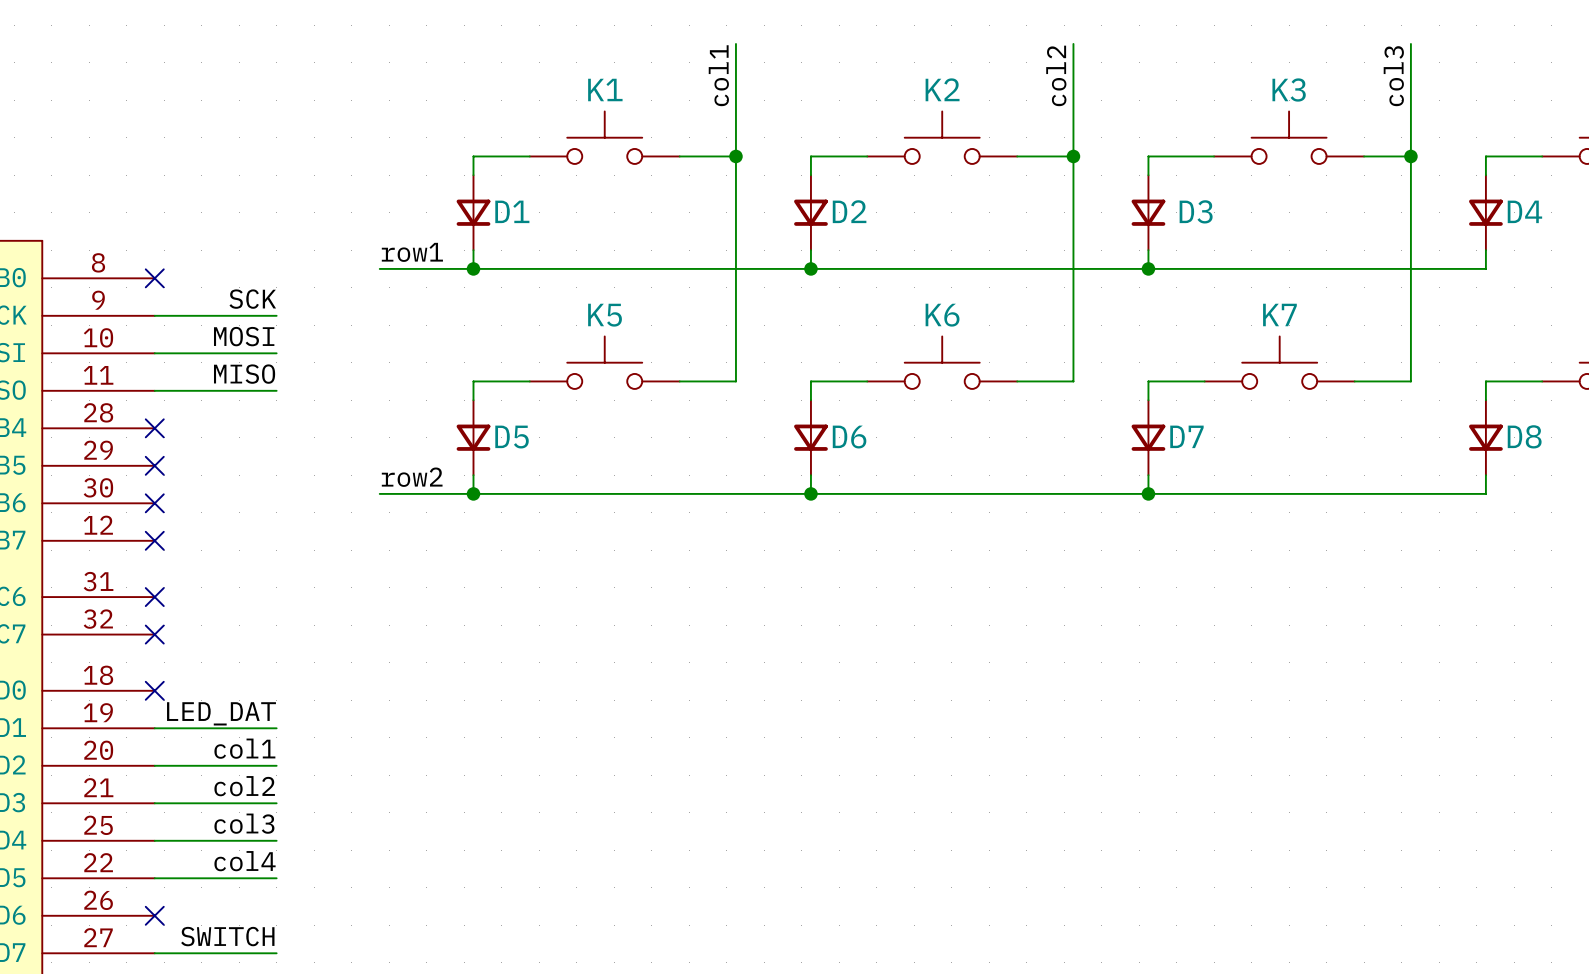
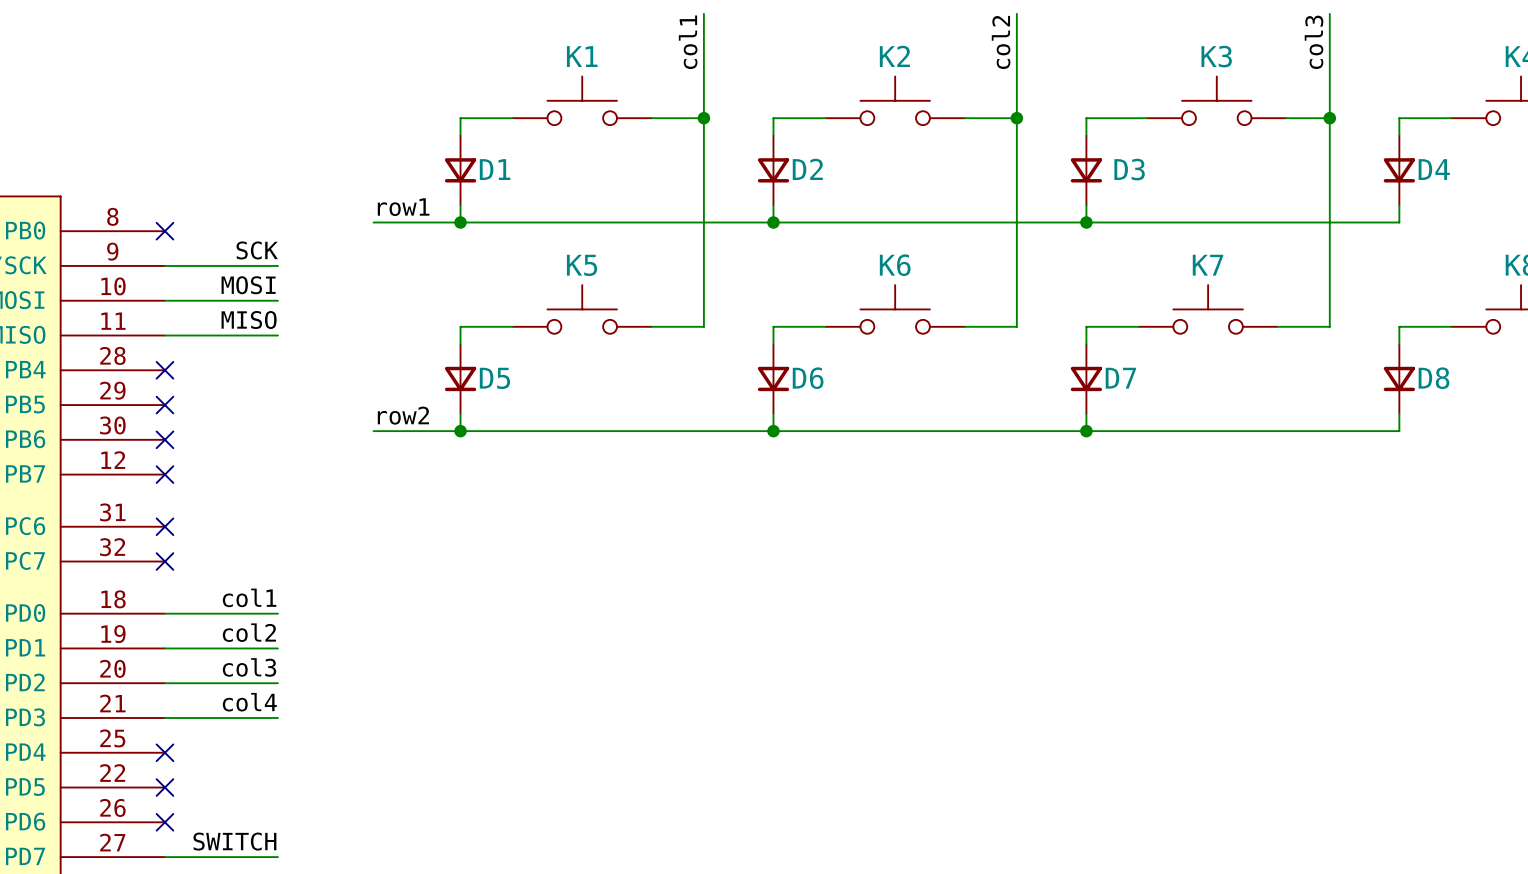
label: none -> col1 (249, 597)
no-connect mark: (154, 690) -> none
label: LED_DAT (221, 713) -> col2 (249, 632)
label: col1 (244, 748) -> col3 (249, 667)
label: col2 (244, 786) -> col4 (249, 702)
label: col3 (244, 823) -> none
wire: (154, 840) (276, 840) -> (164, 613) (277, 613)
no-connect mark: none -> (164, 752)
label: col4 (245, 861) -> none
wire: (154, 878) (276, 878) -> none
no-connect mark: none -> (164, 787)

